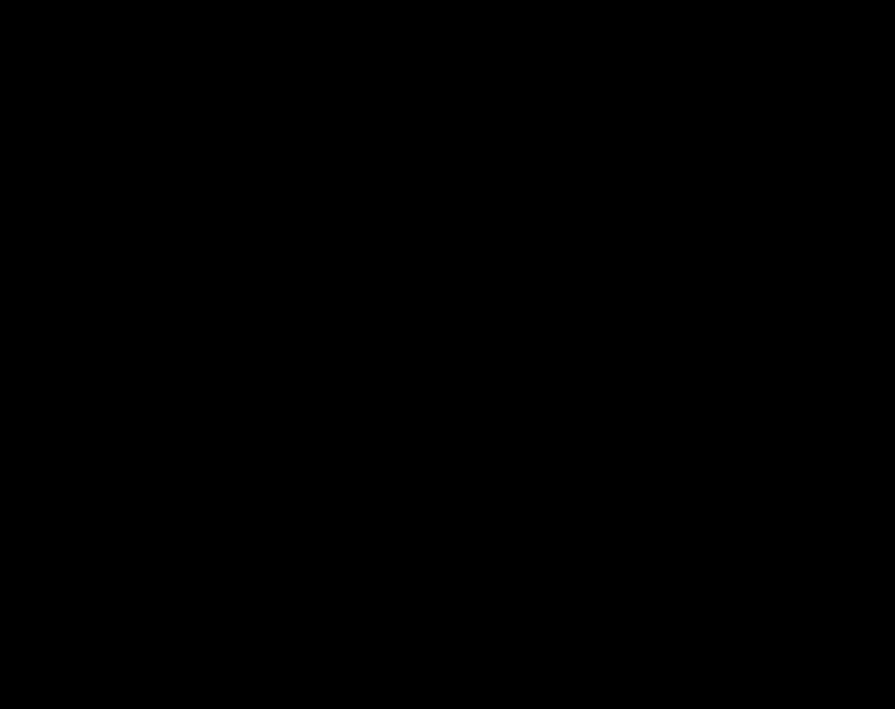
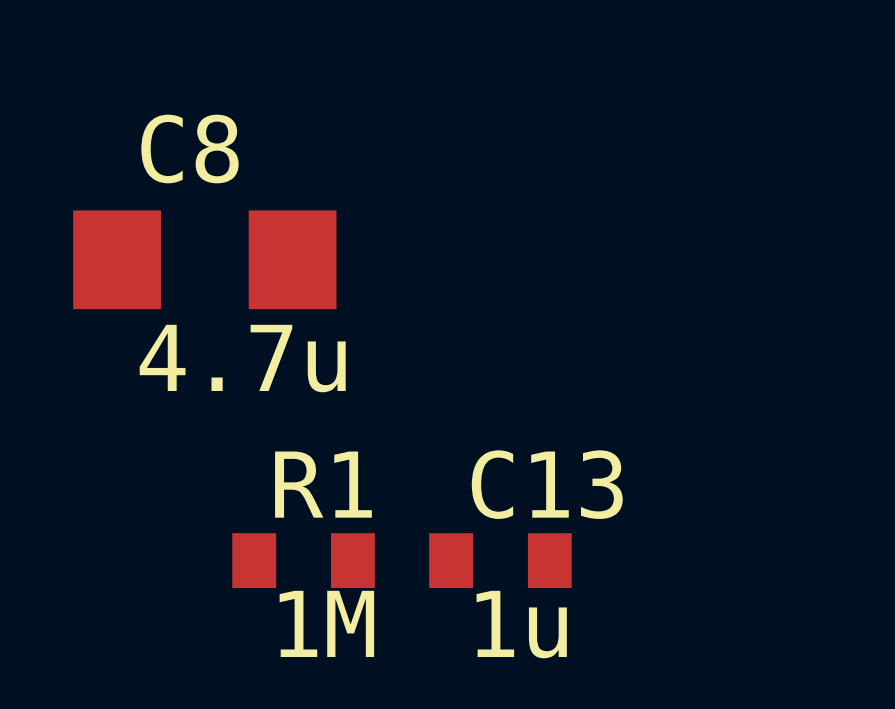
C8: none -> 4.7u (204, 259)
R1: none -> 1M (303, 560)
C13: none -> 1u (500, 560)

